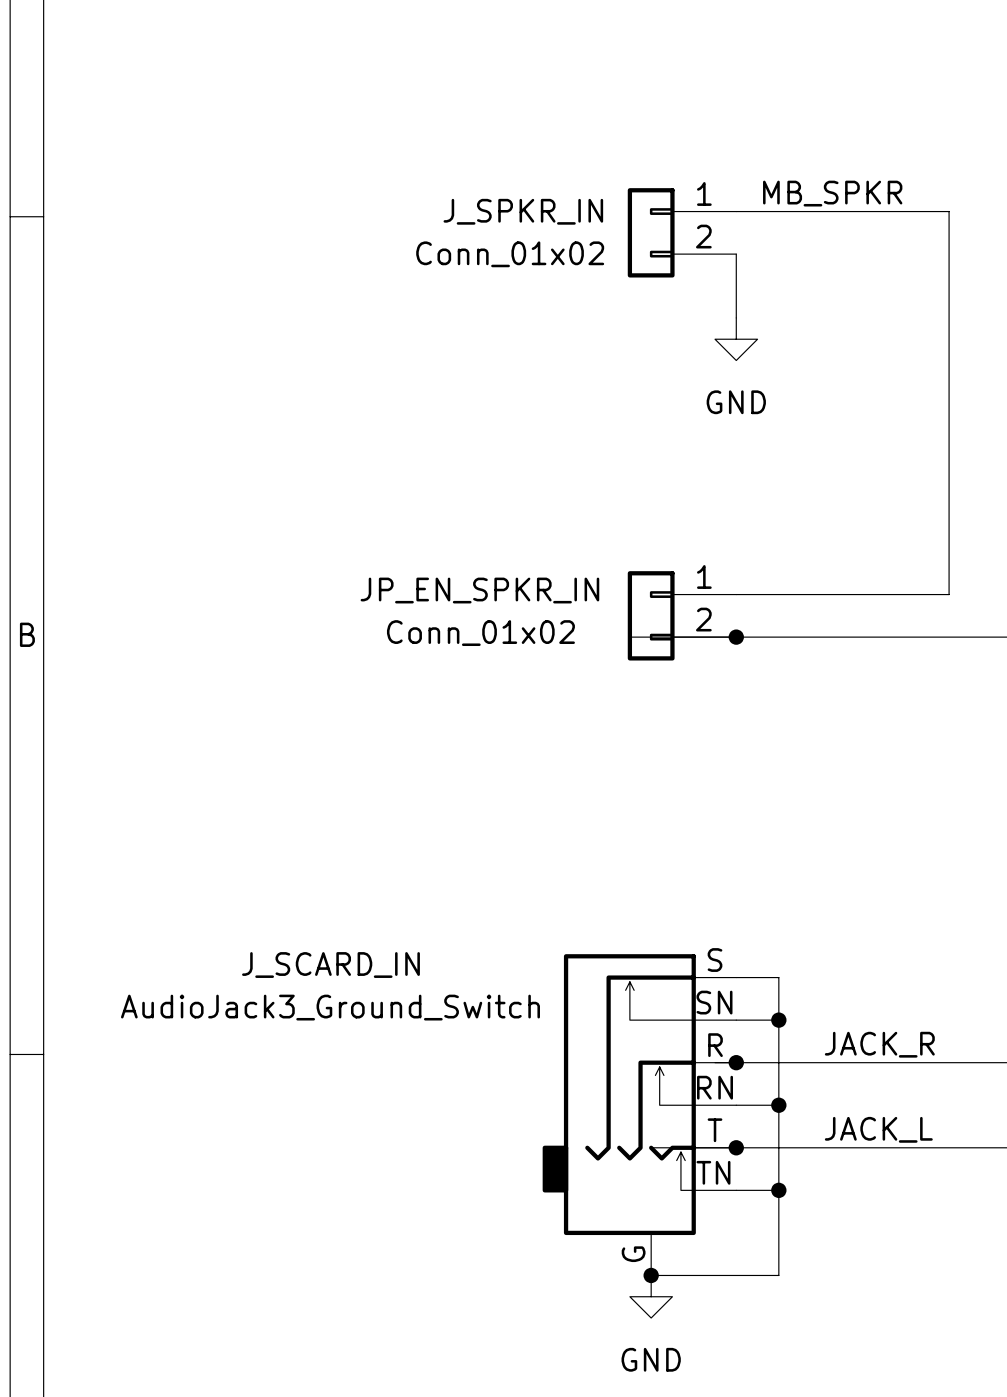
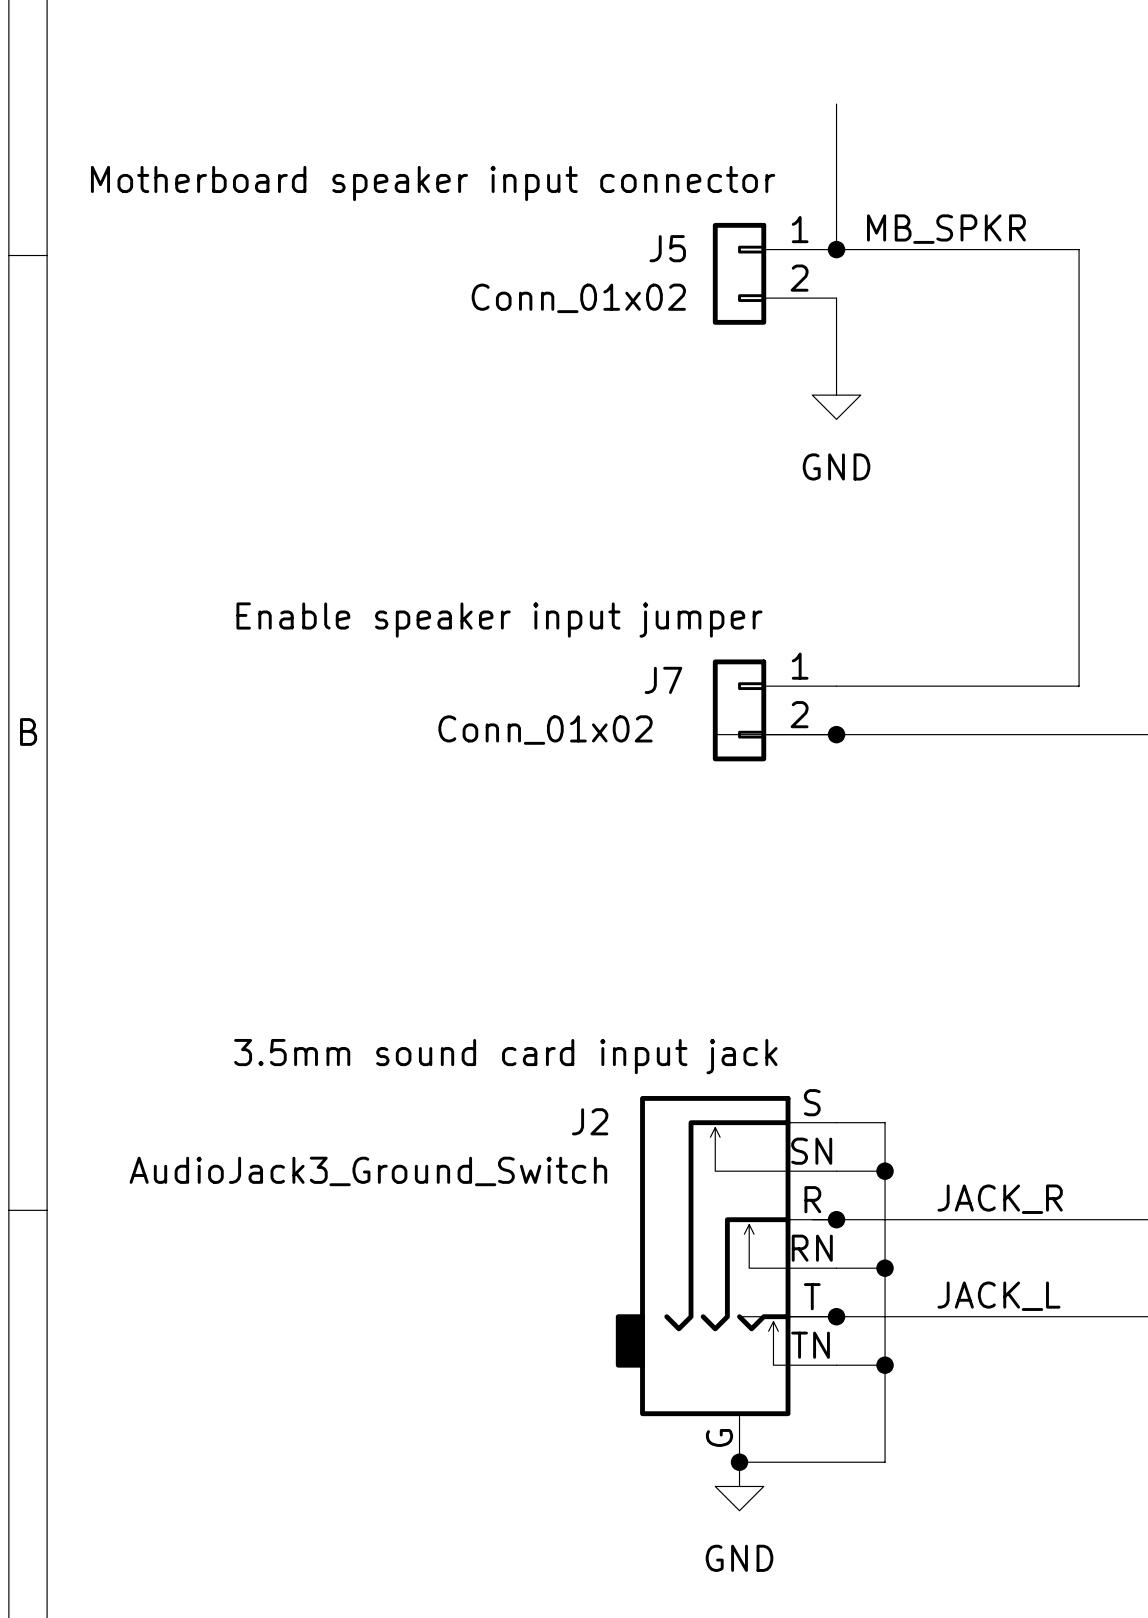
wire: none -> (836, 104) (836, 249)
label: none -> Motherboard speaker input connector (433, 183)
J_SPKR_IN name: J_SPKR_IN (523, 211) -> J5 (667, 248)
junction: none -> (836, 249)
label: none -> Enable speaker input jumper (499, 620)
JP_EN_SPKR_IN name: JP_EN_SPKR_IN (479, 590) -> J7 (663, 680)
label: none -> 3.5mm sound card input jack (505, 1056)
J_SCARD_IN name: J_SCARD_IN (330, 965) -> J2 (590, 1121)
J_SCARD_IN value position: AudioJack3_Ground_Switch (330, 1007) -> AudioJack3_Ground_Switch (368, 1171)

